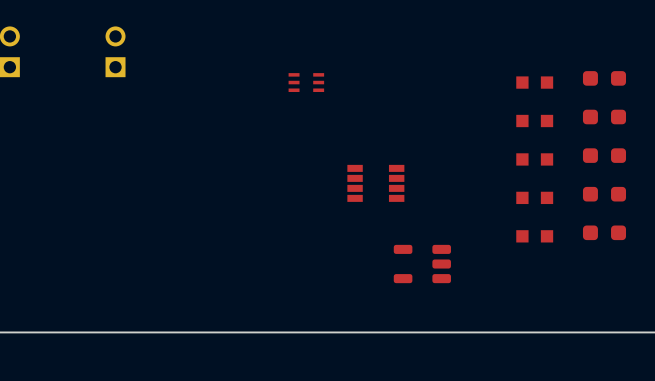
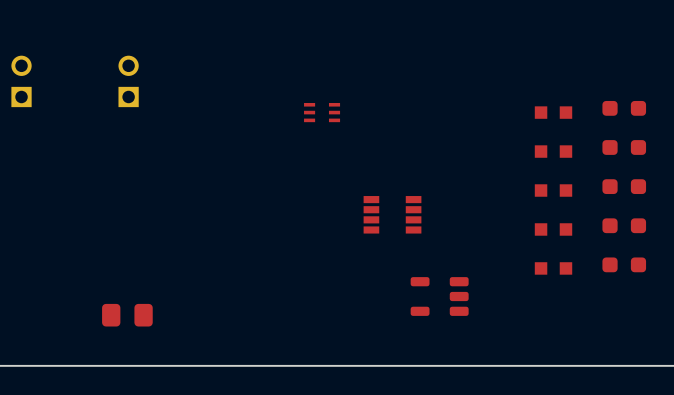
part: none -> (127, 315)

